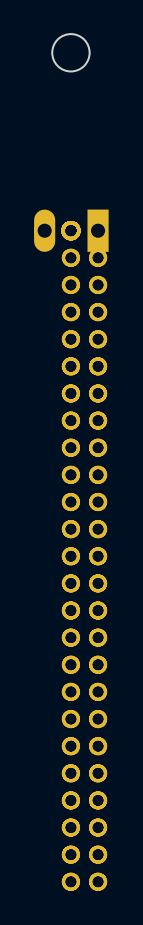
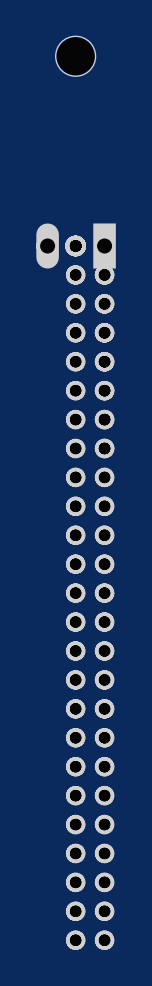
part: none -> (104, 347)

